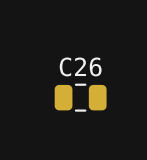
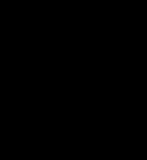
C26: (80, 97) -> none

